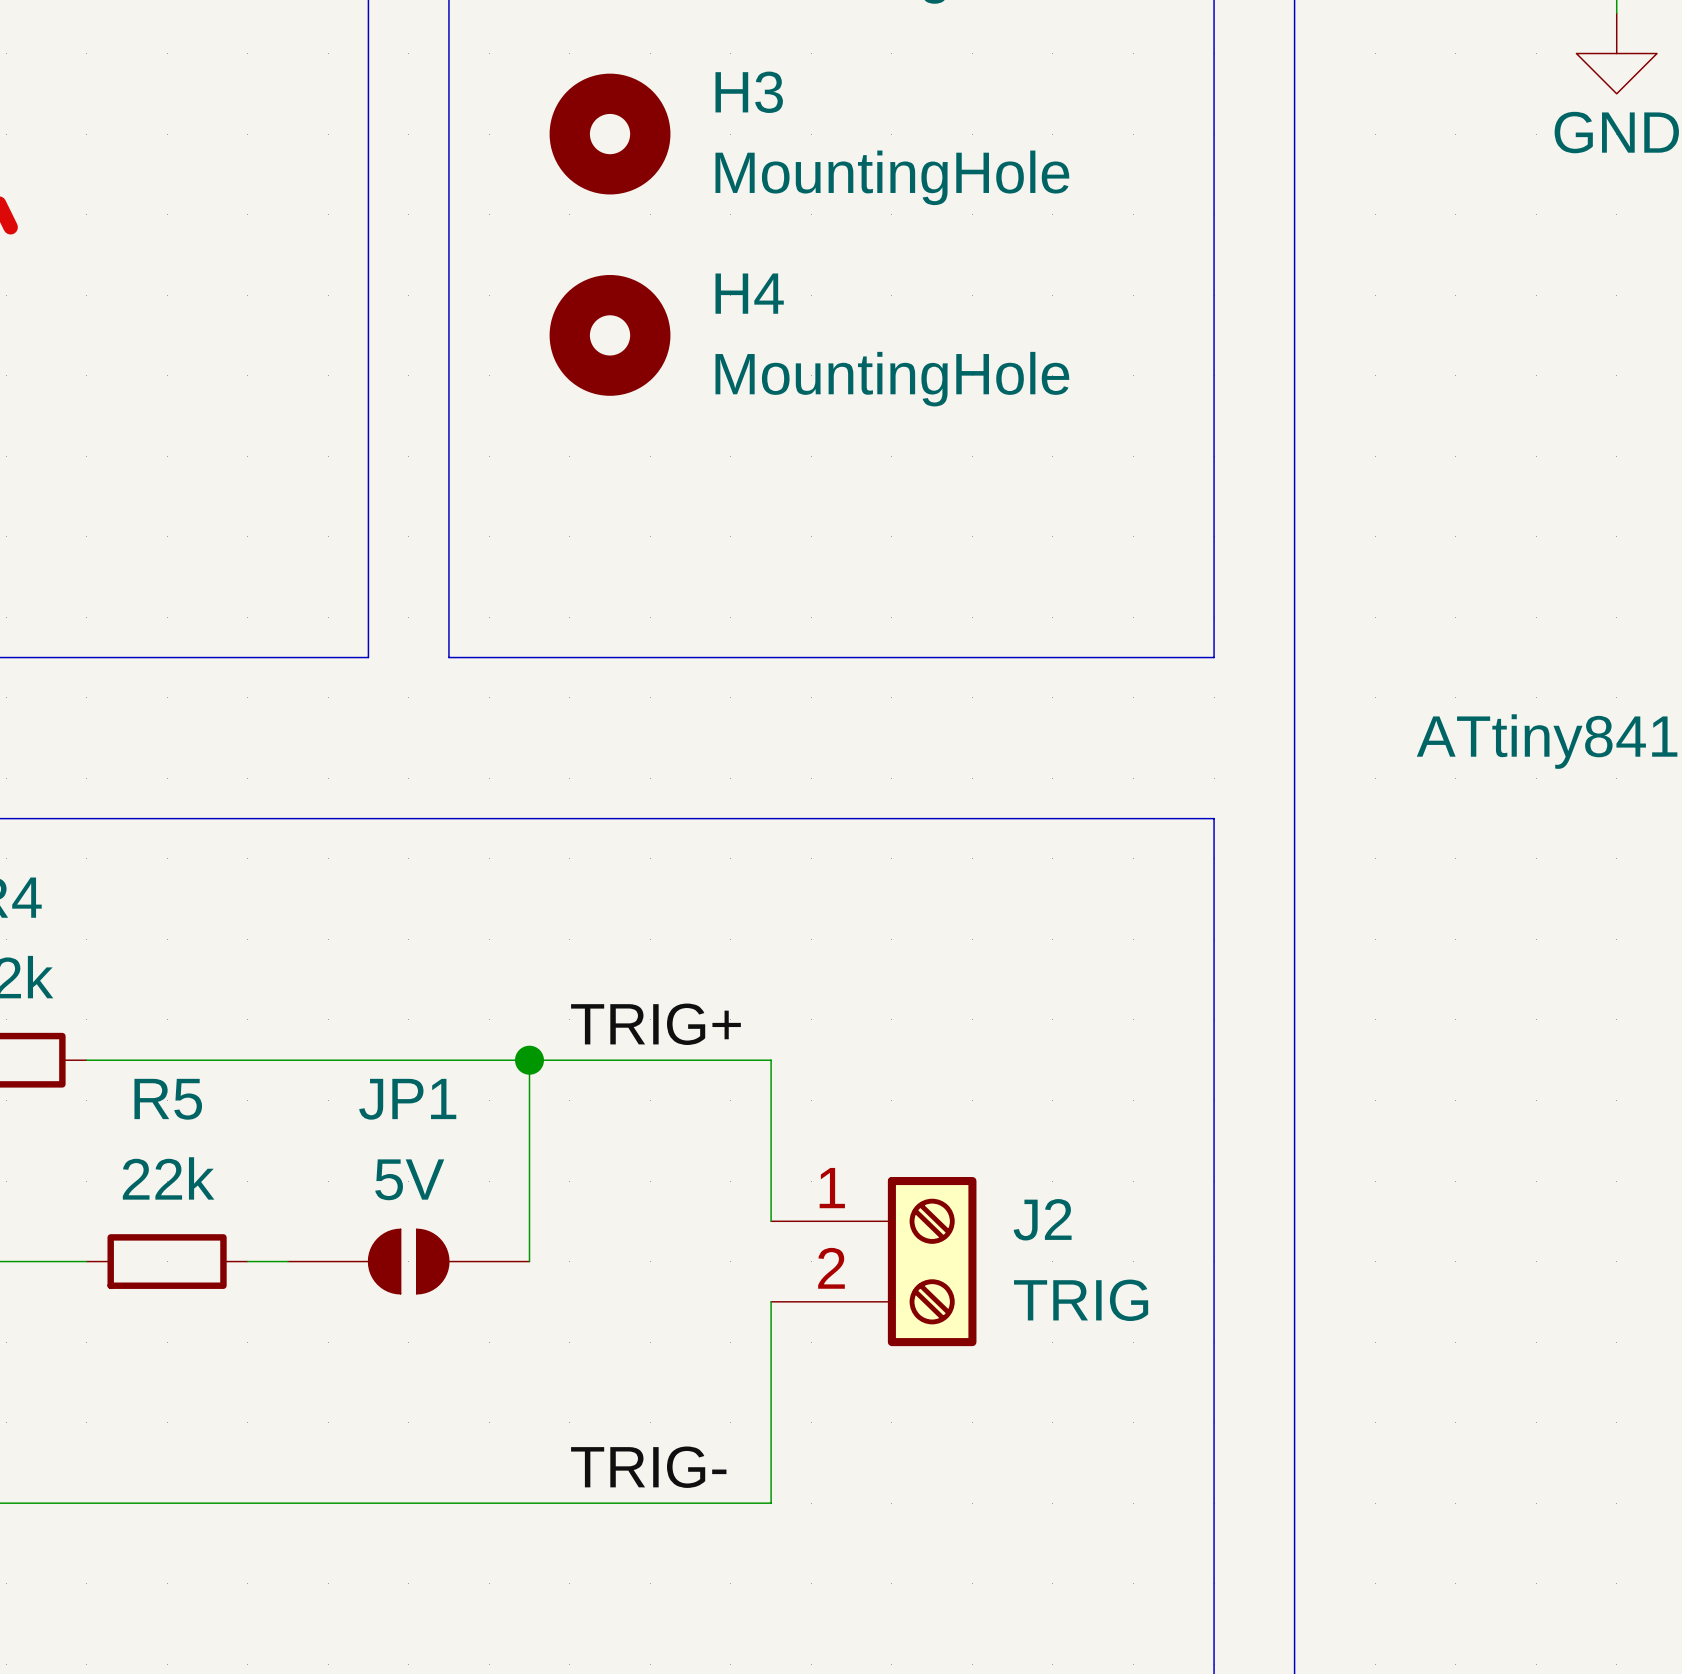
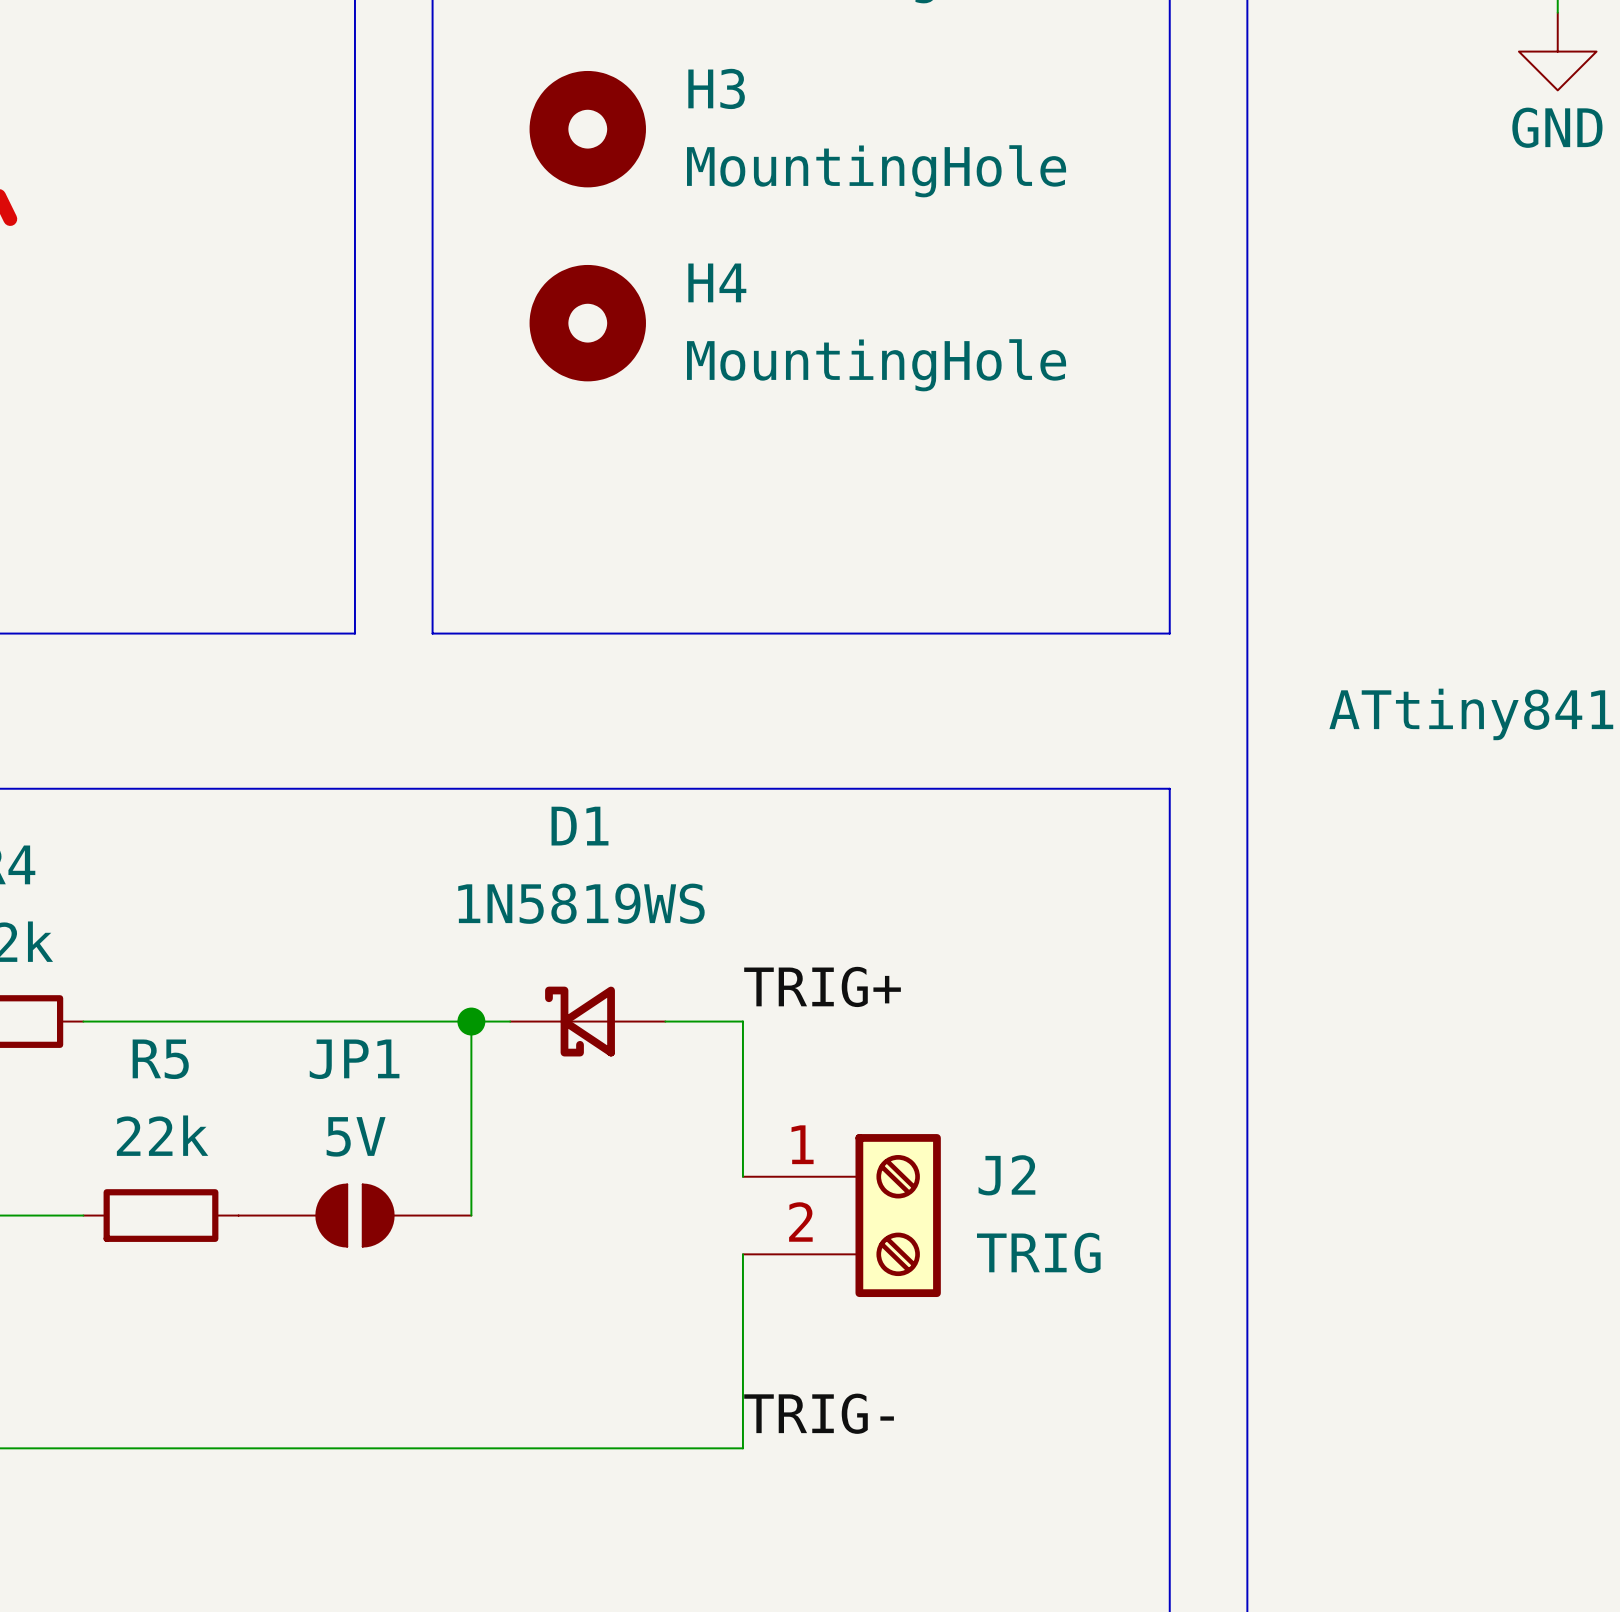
label position: TRIG+ (655, 1024) -> TRIG+ (822, 986)
wire: none -> (471, 1021) (471, 1215)
junction position: (529, 1060) -> (471, 1021)
D1: none -> 1N5819WS (587, 1021)
wire: (690, 1060) (529, 1060) (529, 1261) -> none
JP1 position: (408, 1261) -> (354, 1215)
label position: TRIG- (648, 1467) -> TRIG- (819, 1413)

